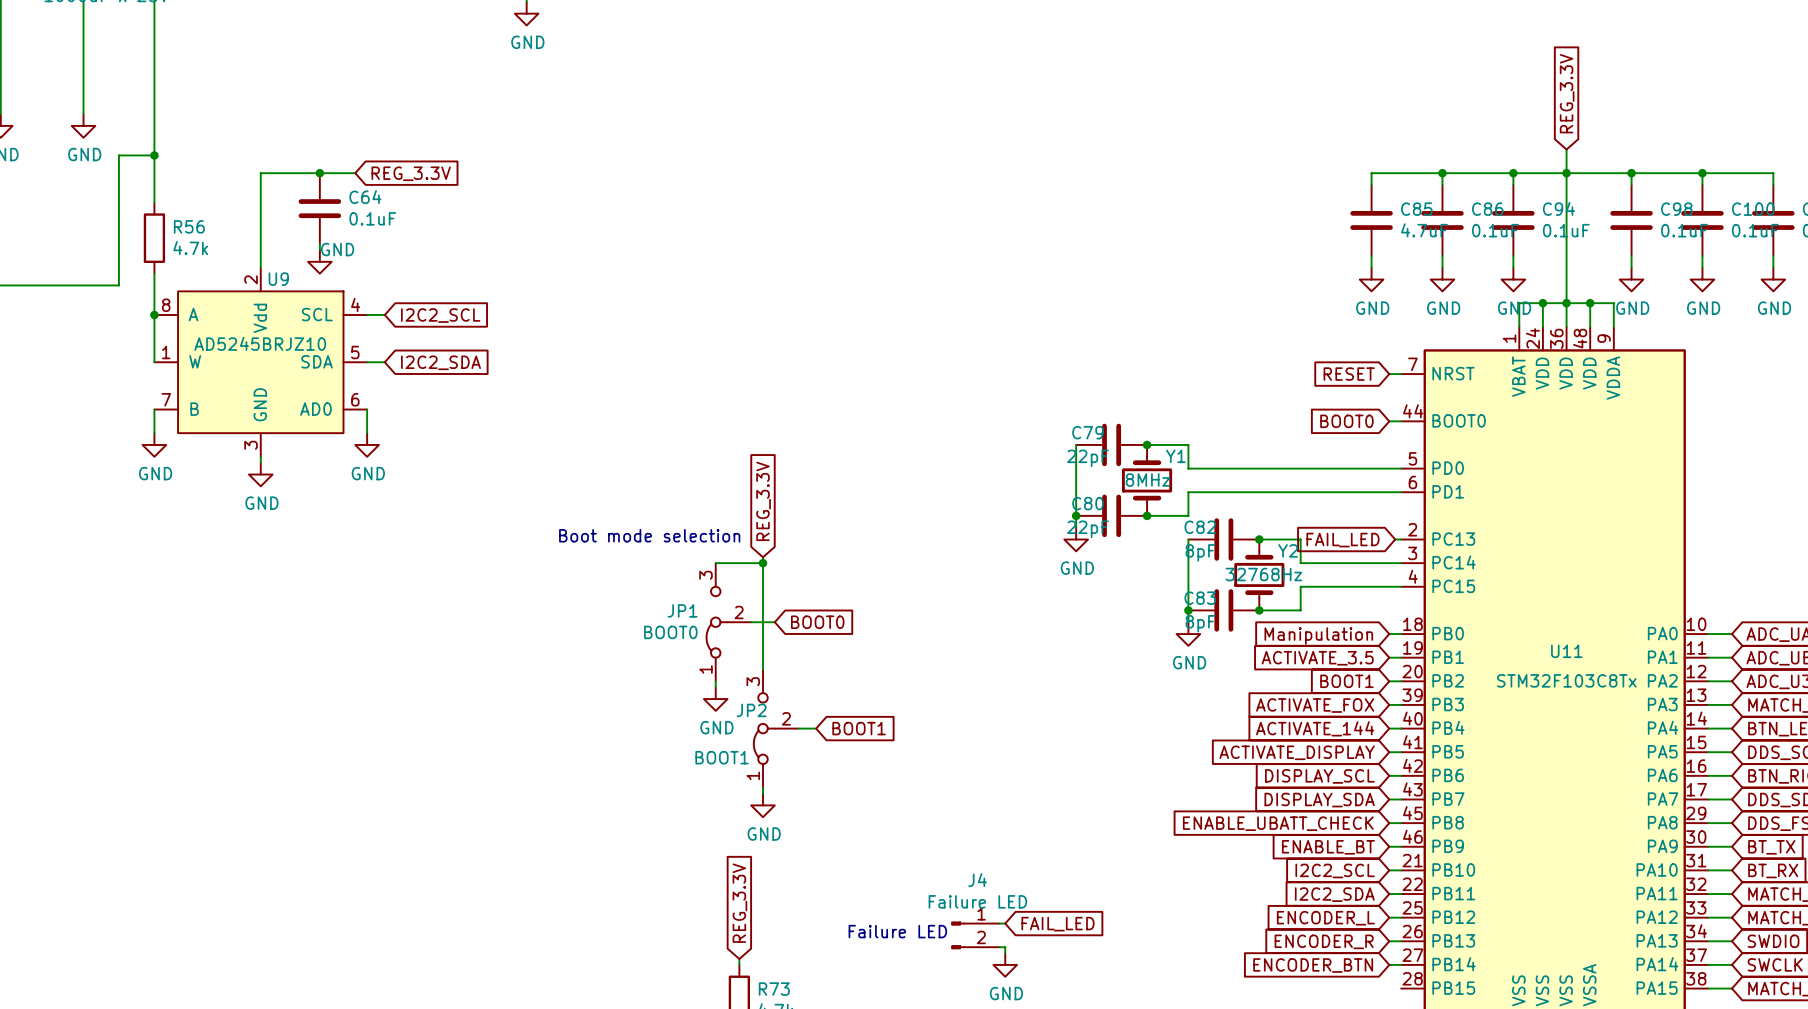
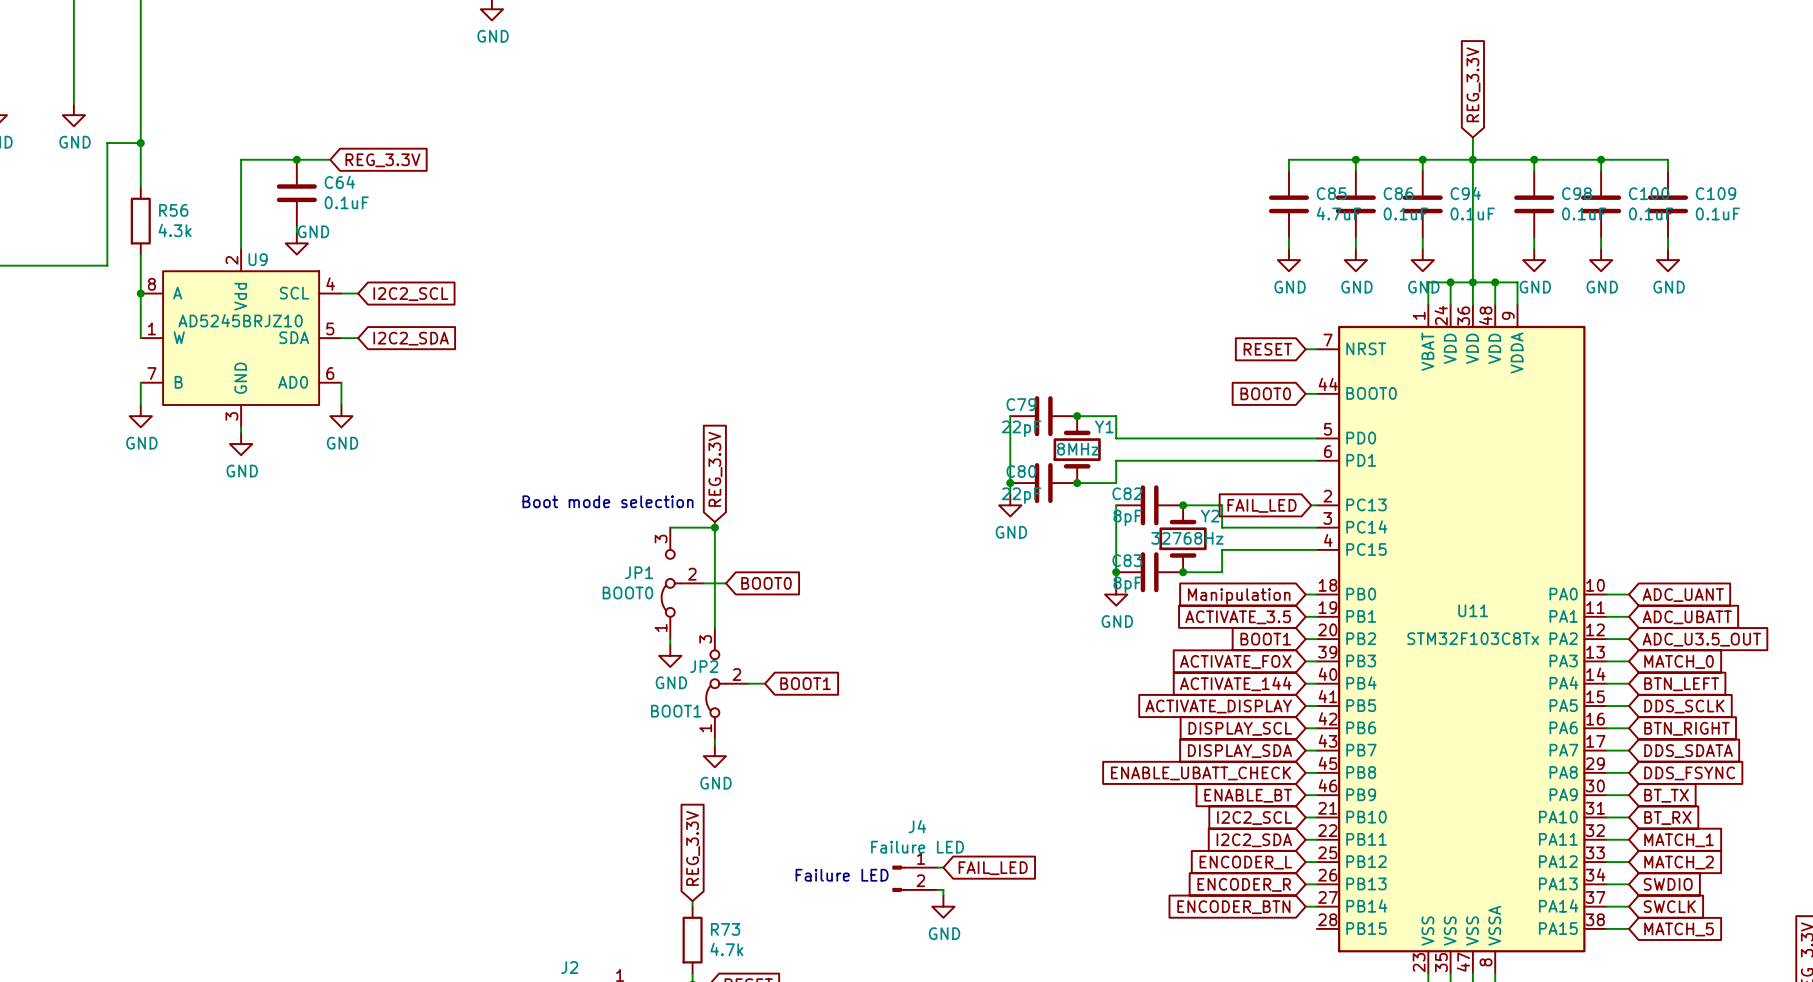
R56 value: 4.7k (190, 248) -> 4.3k (175, 230)

